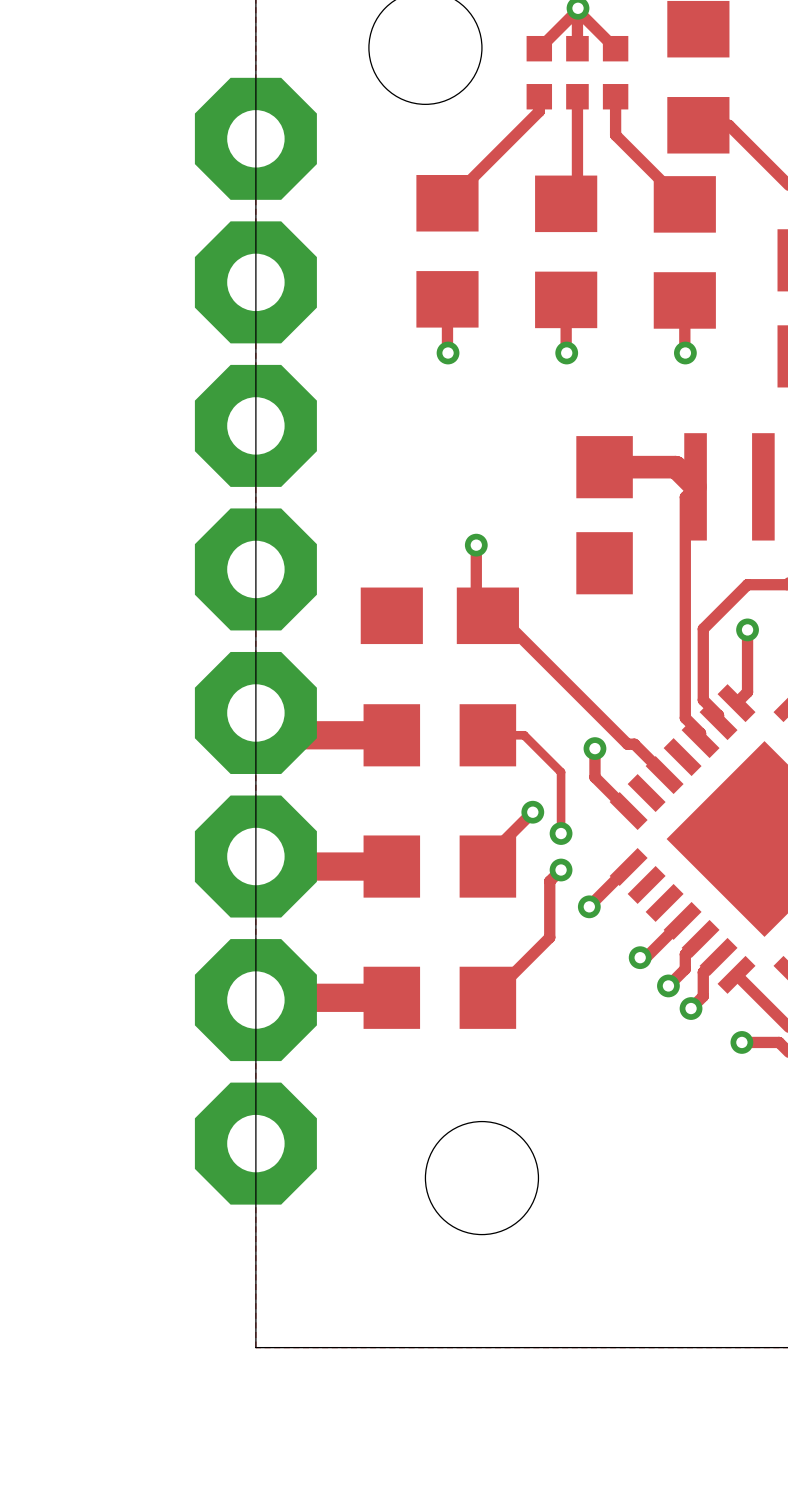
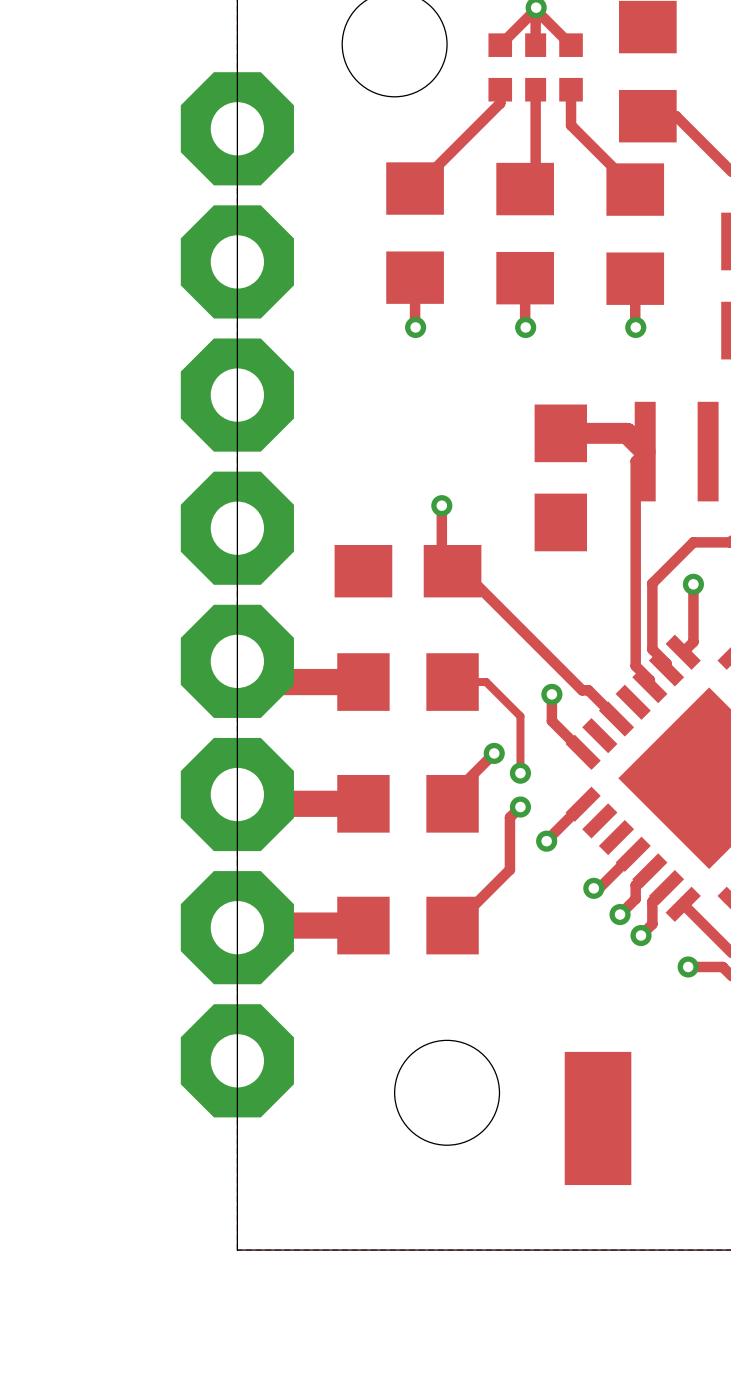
part: none -> (598, 1118)

